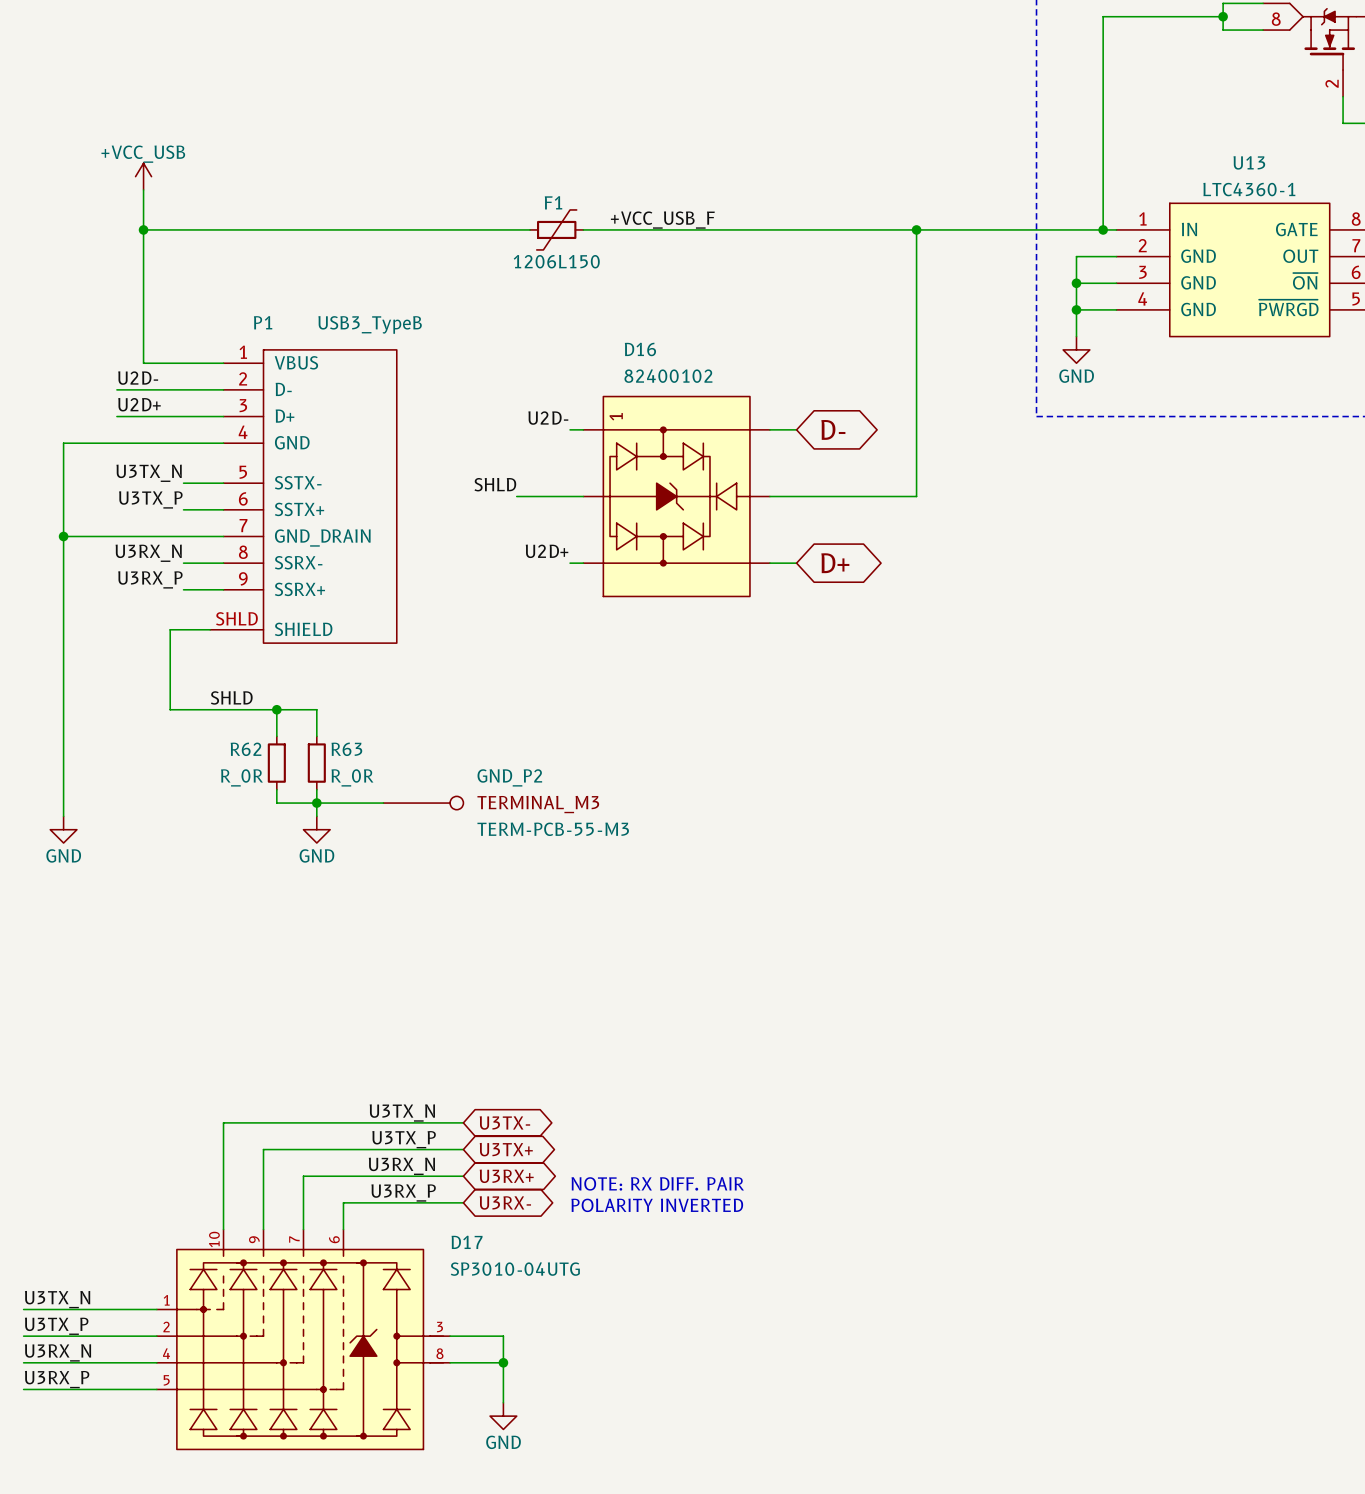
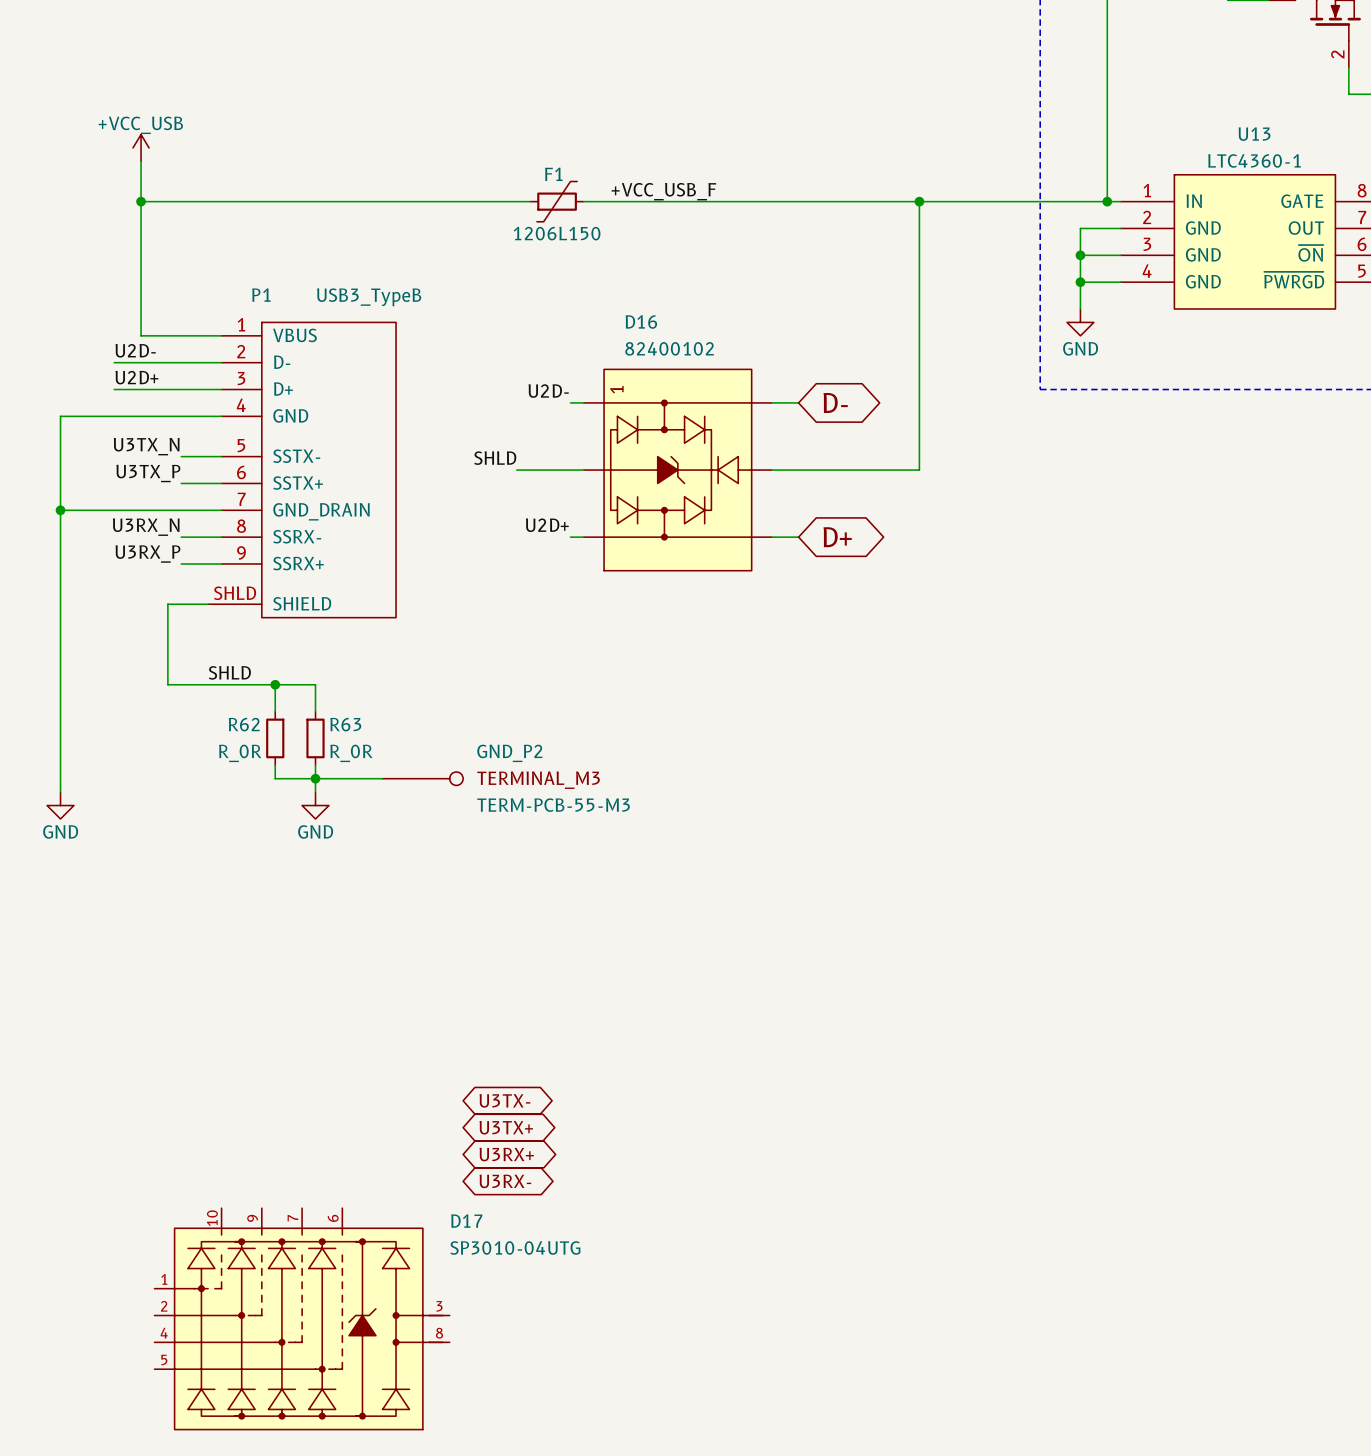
label: U3TX_N (402, 1113) -> none
wire: (463, 1122) (223, 1122) (223, 1229) -> none
label: U3TX_P (404, 1139) -> none
wire: (463, 1149) (263, 1149) (263, 1229) -> none
label: U3RX_N (401, 1166) -> none
wire: (463, 1176) (303, 1176) (303, 1229) -> none
text: NOTE: RX DIFF. PAIR (657, 1183) -> none
label: U3RX_P (403, 1192) -> none
wire: (463, 1202) (343, 1202) (343, 1229) -> none
text: POLARITY INVERTED (657, 1205) -> none
label: U3TX_N (57, 1299) -> none
wire: (23, 1309) (156, 1309) -> none
label: U3TX_P (56, 1326) -> none
wire: (23, 1336) (156, 1336) -> none
wire: (450, 1336) (503, 1336) (503, 1402) -> none
label: U3RX_N (58, 1352) -> none
wire: (23, 1362) (156, 1362) -> none
wire: (450, 1362) (503, 1362) -> none
junction: (503, 1362) -> none
label: U3RX_P (57, 1379) -> none
wire: (23, 1389) (156, 1389) -> none
power symbol: GND (503, 1416) -> none

